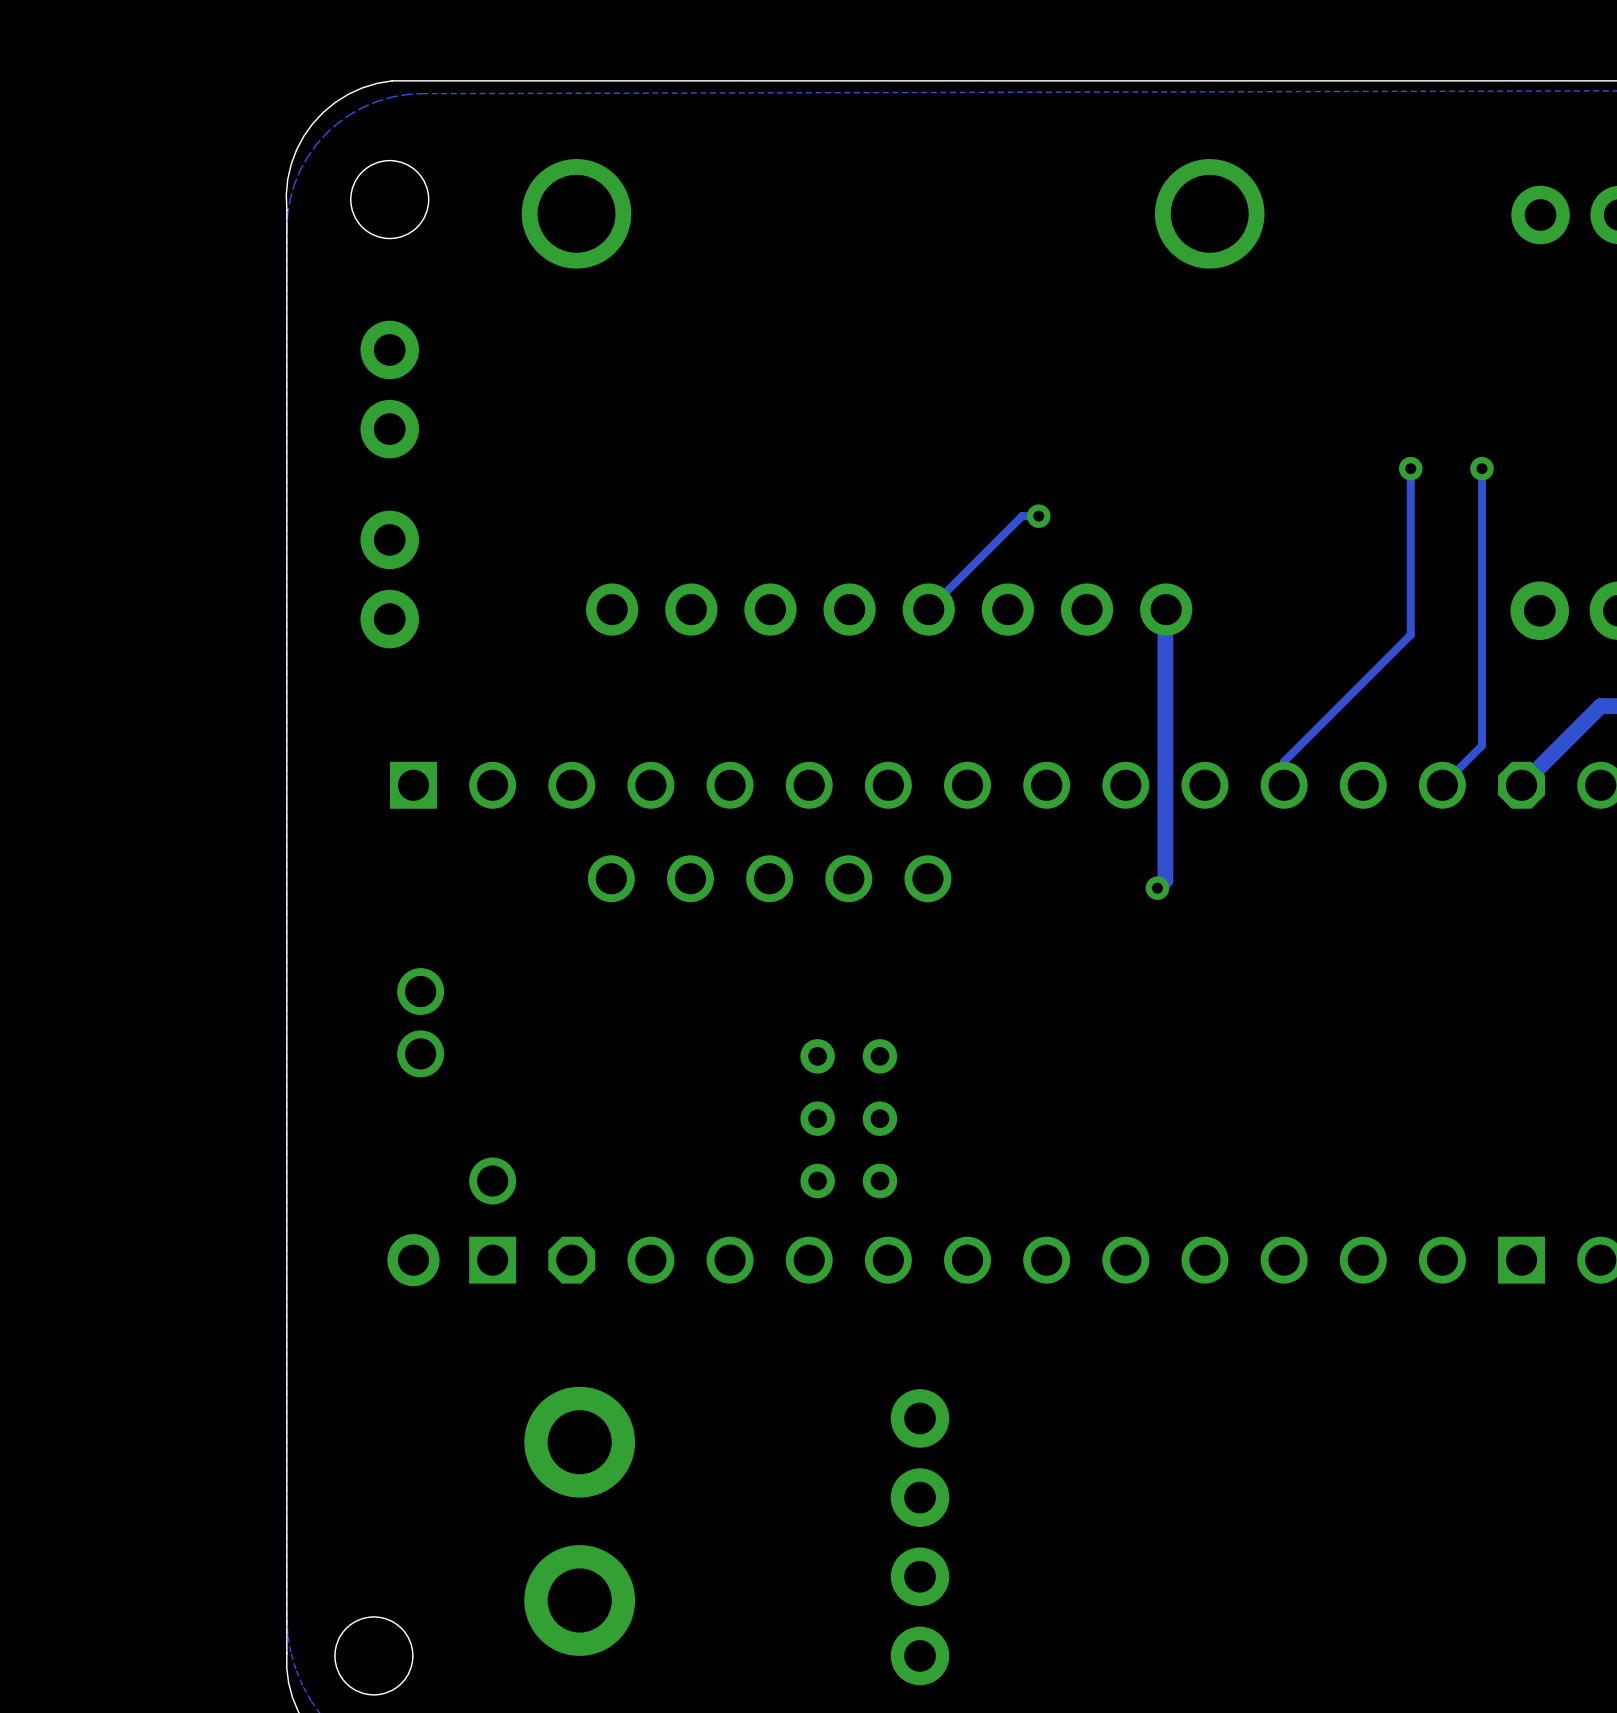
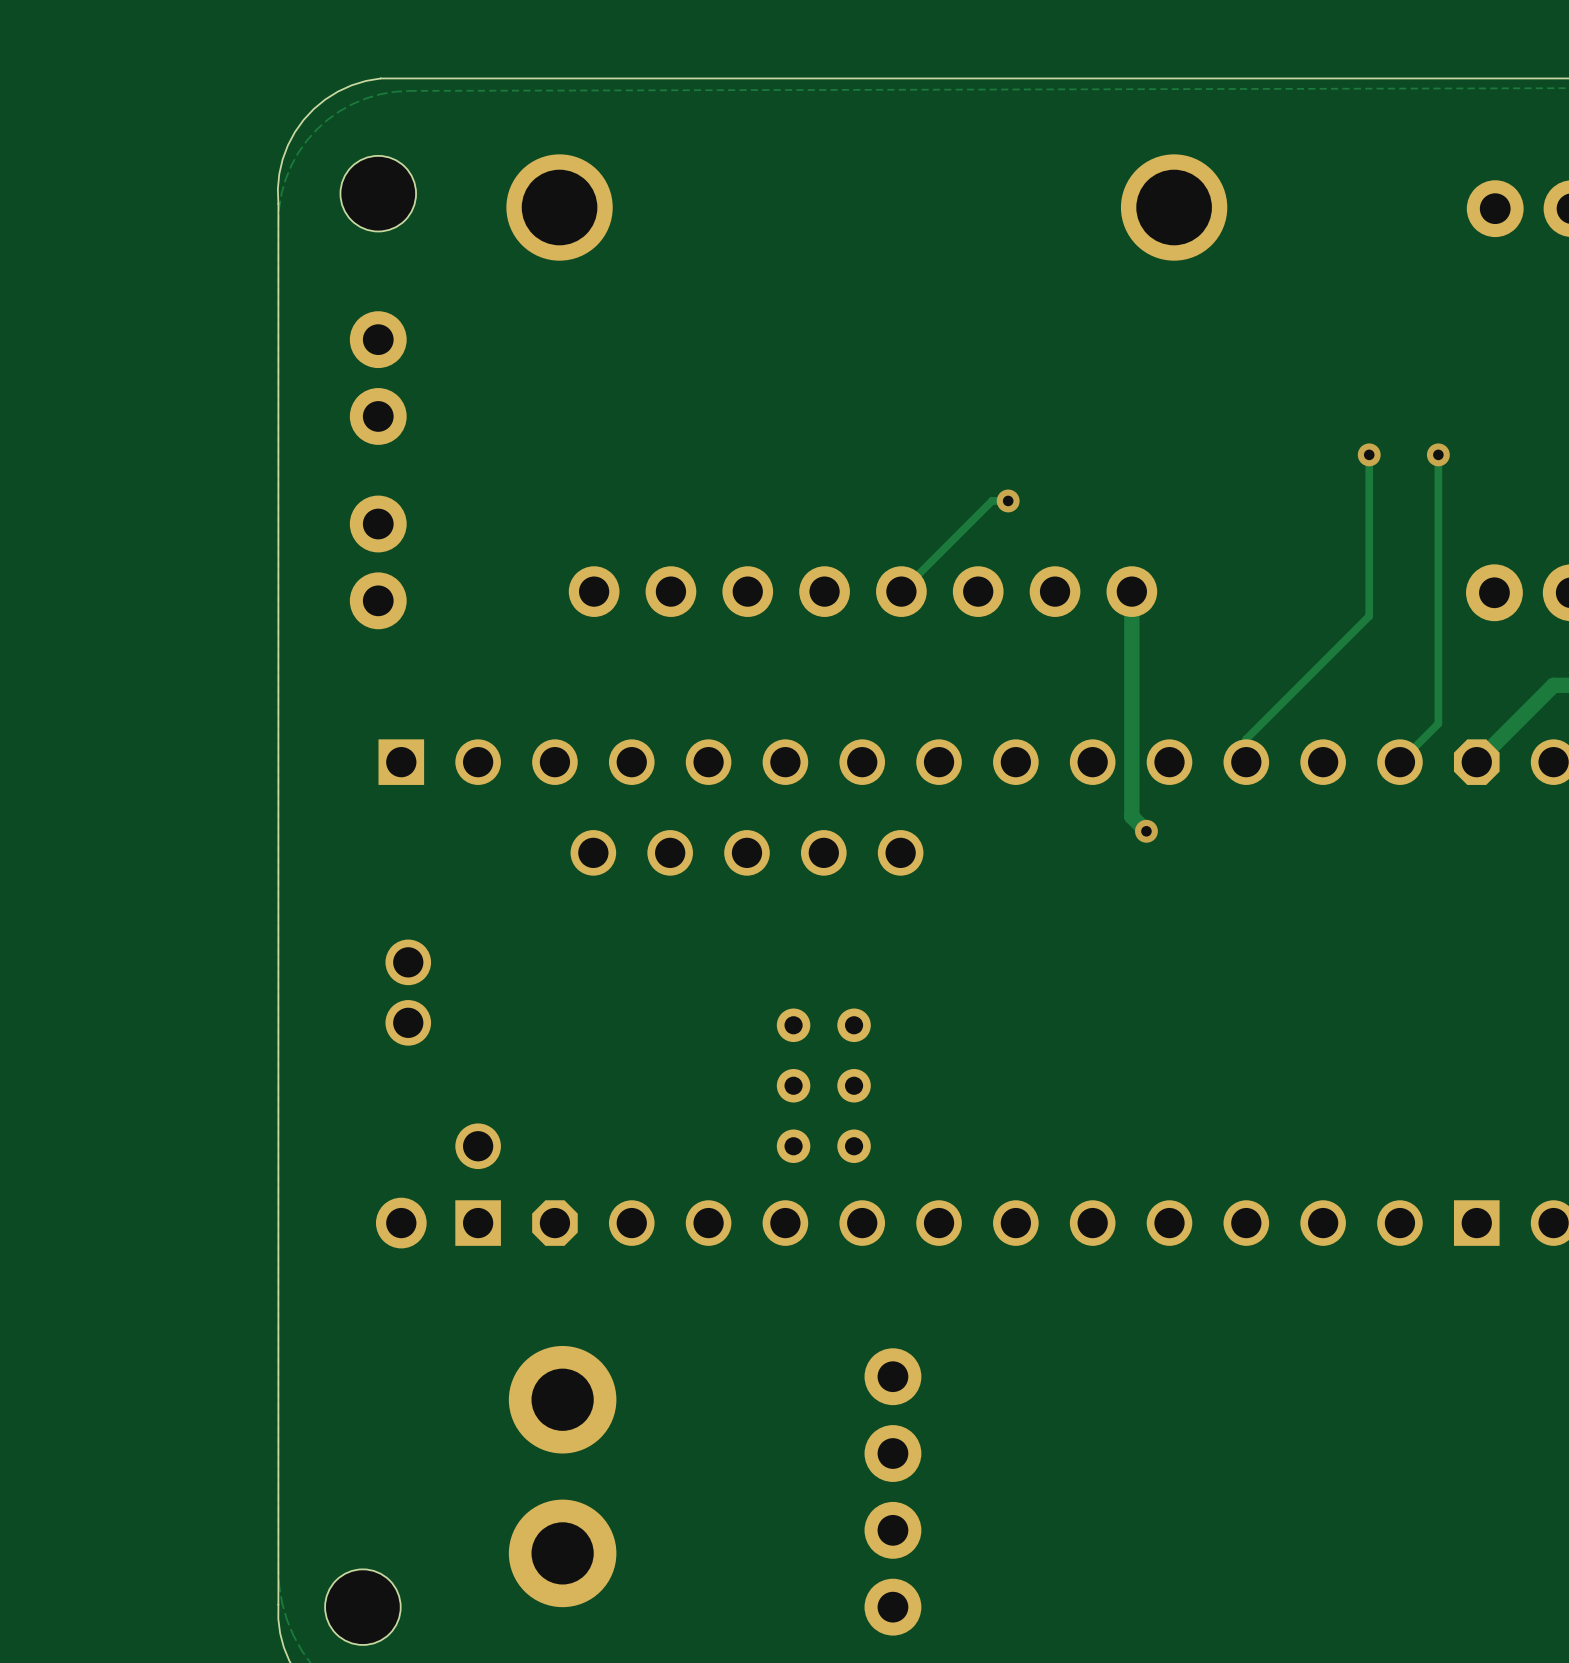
track: (1165, 610) (1165, 880) (1157, 888) -> (1131, 591) (1131, 816) (1146, 831)
via position: (1157, 888) -> (1146, 831)

